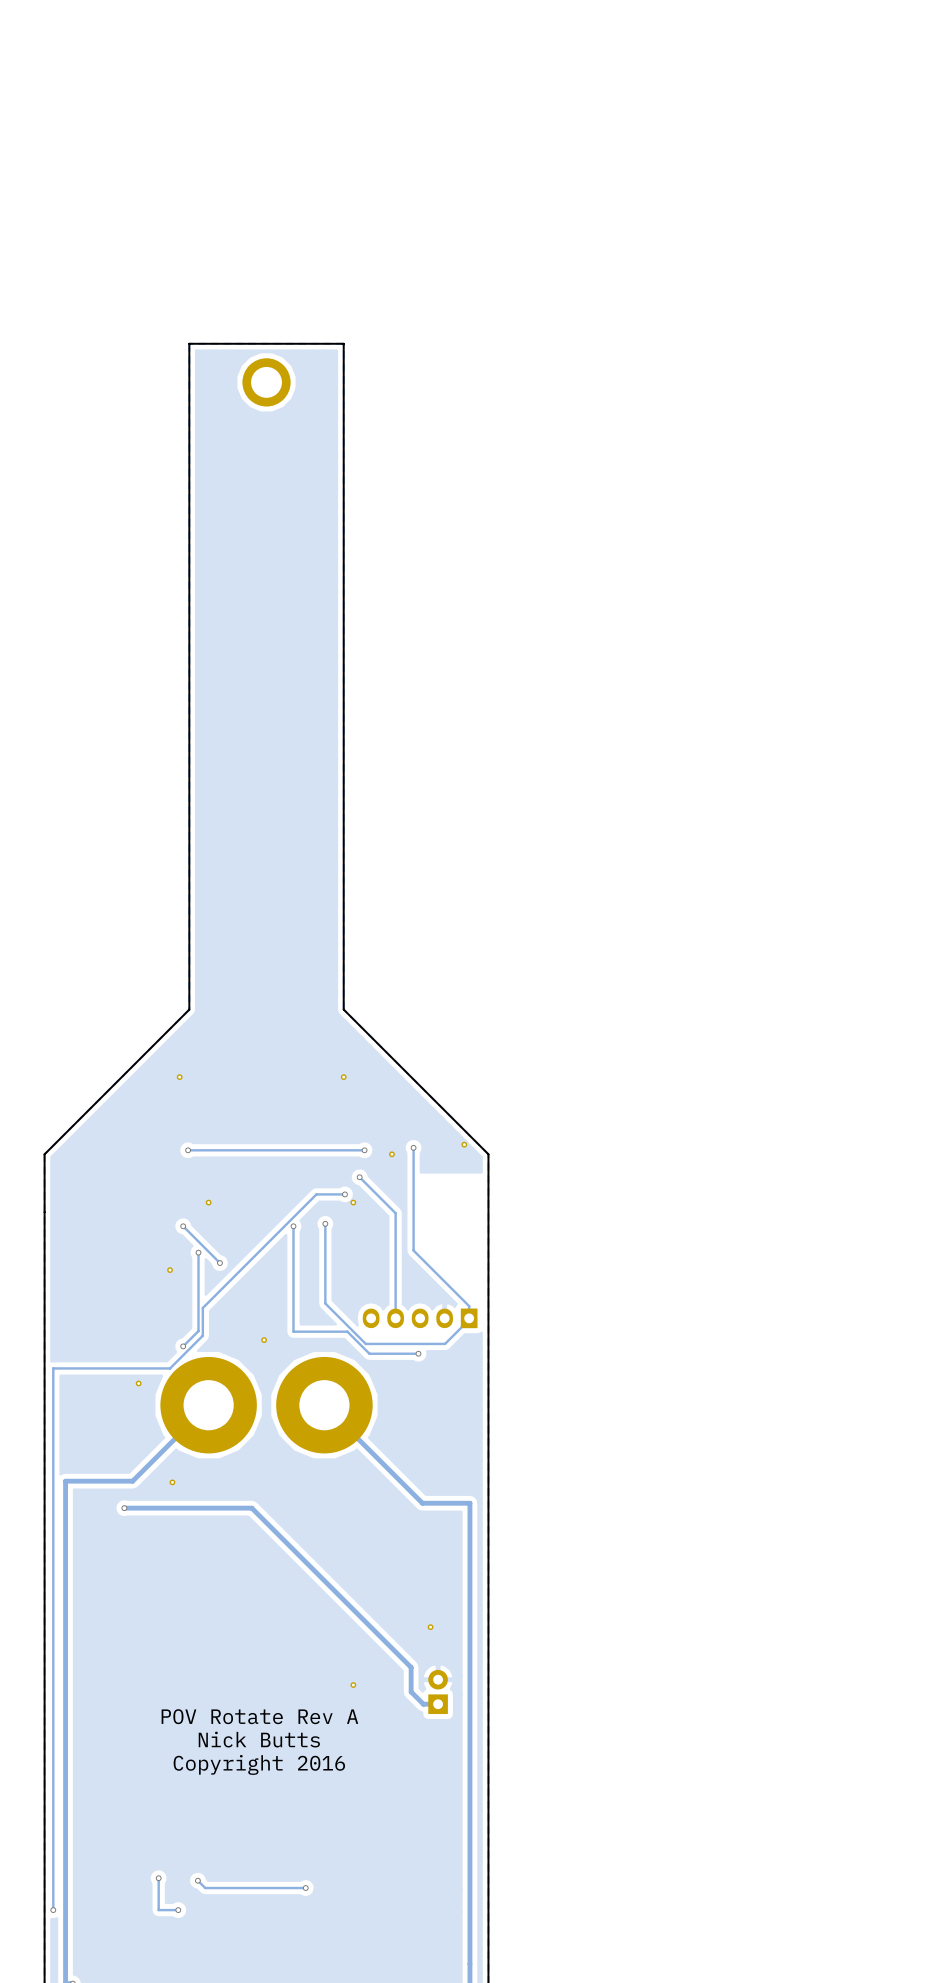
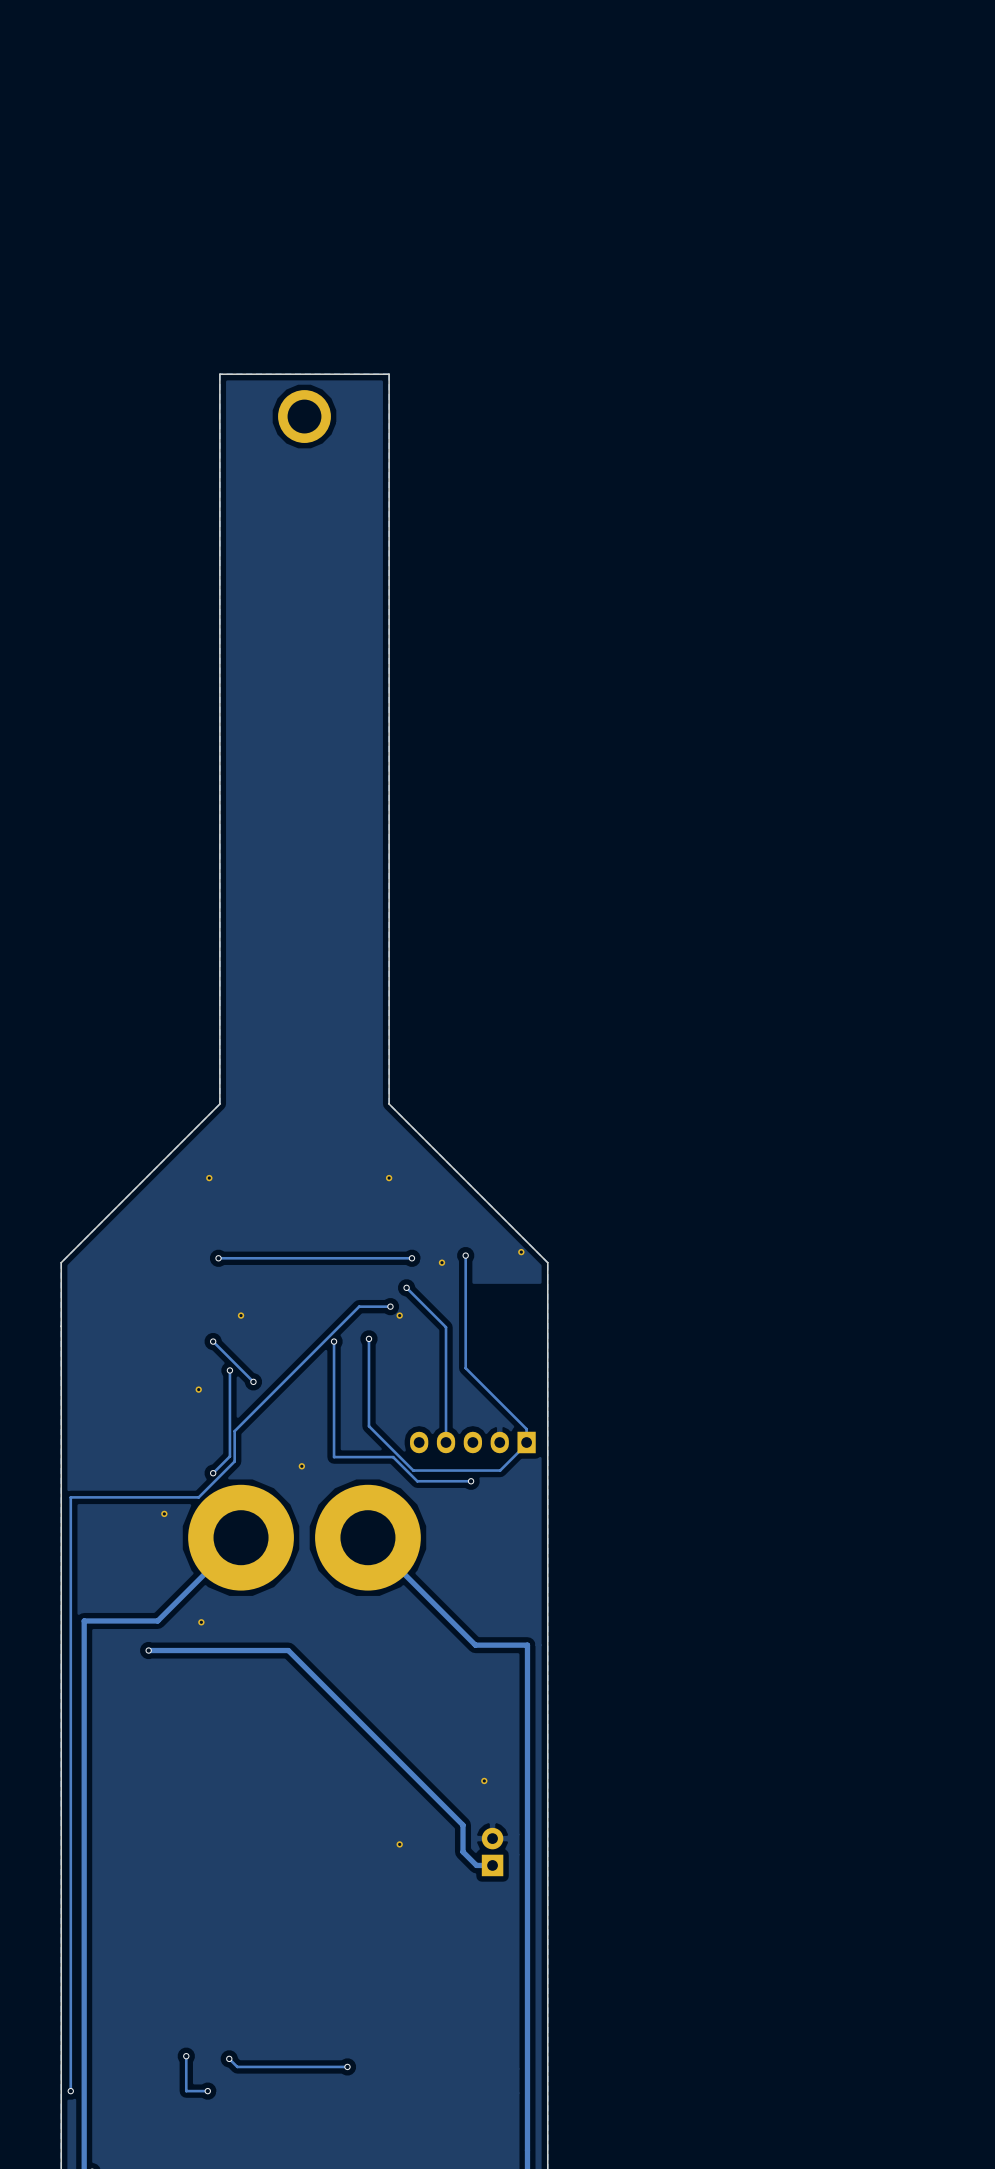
text: POV Rotate Rev A (259, 1716) -> none
text: Nick Butts (259, 1739) -> none
text: Copyright 2016 (259, 1764) -> none

